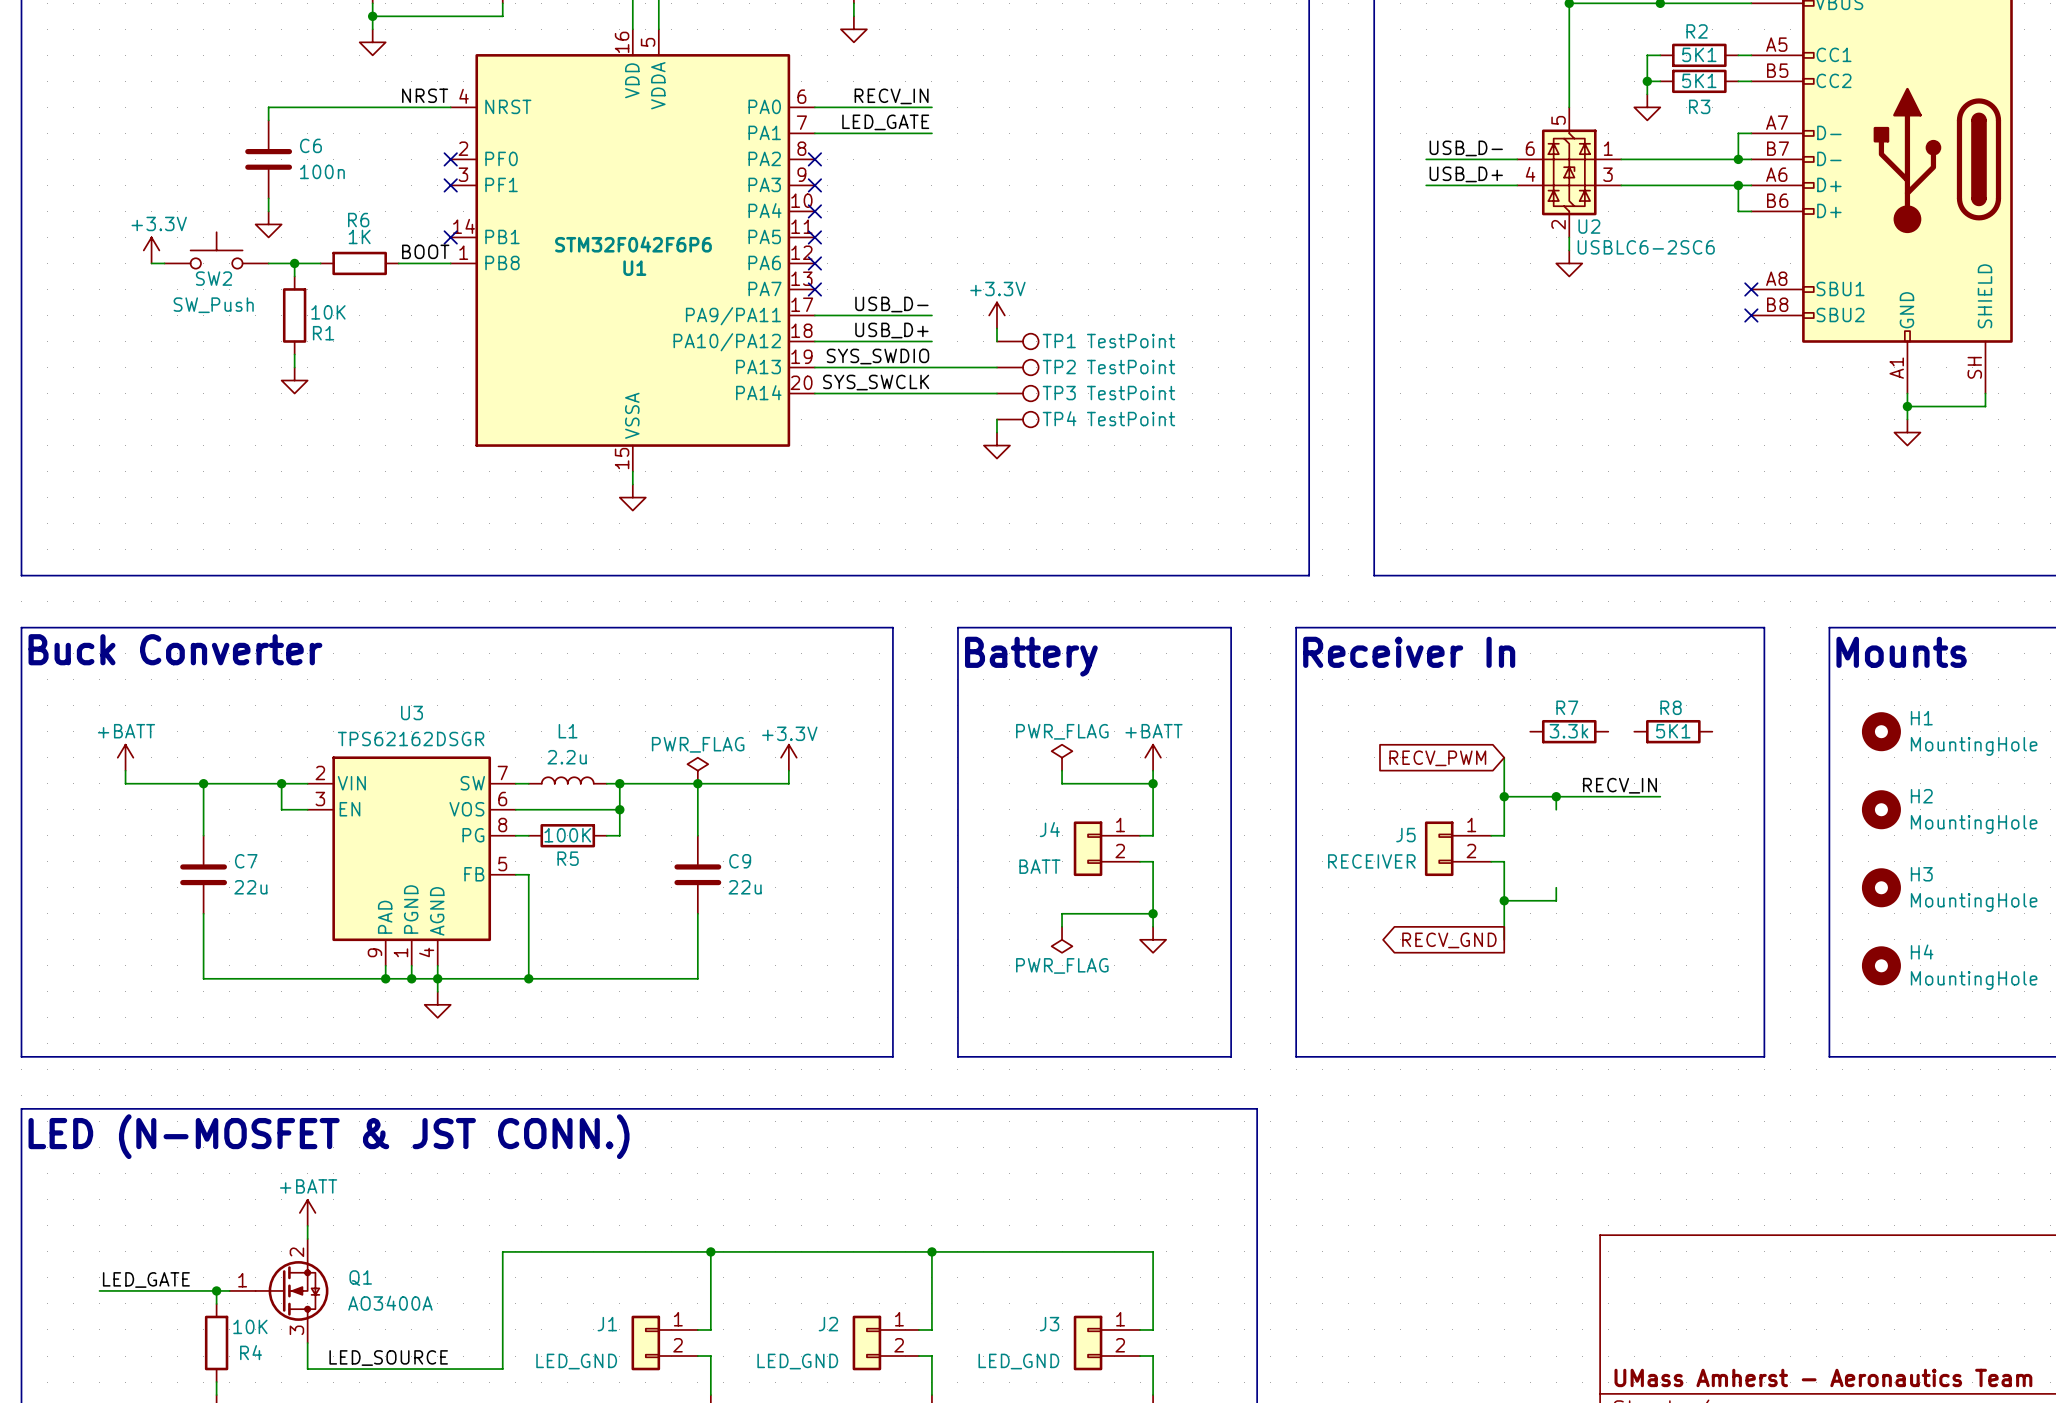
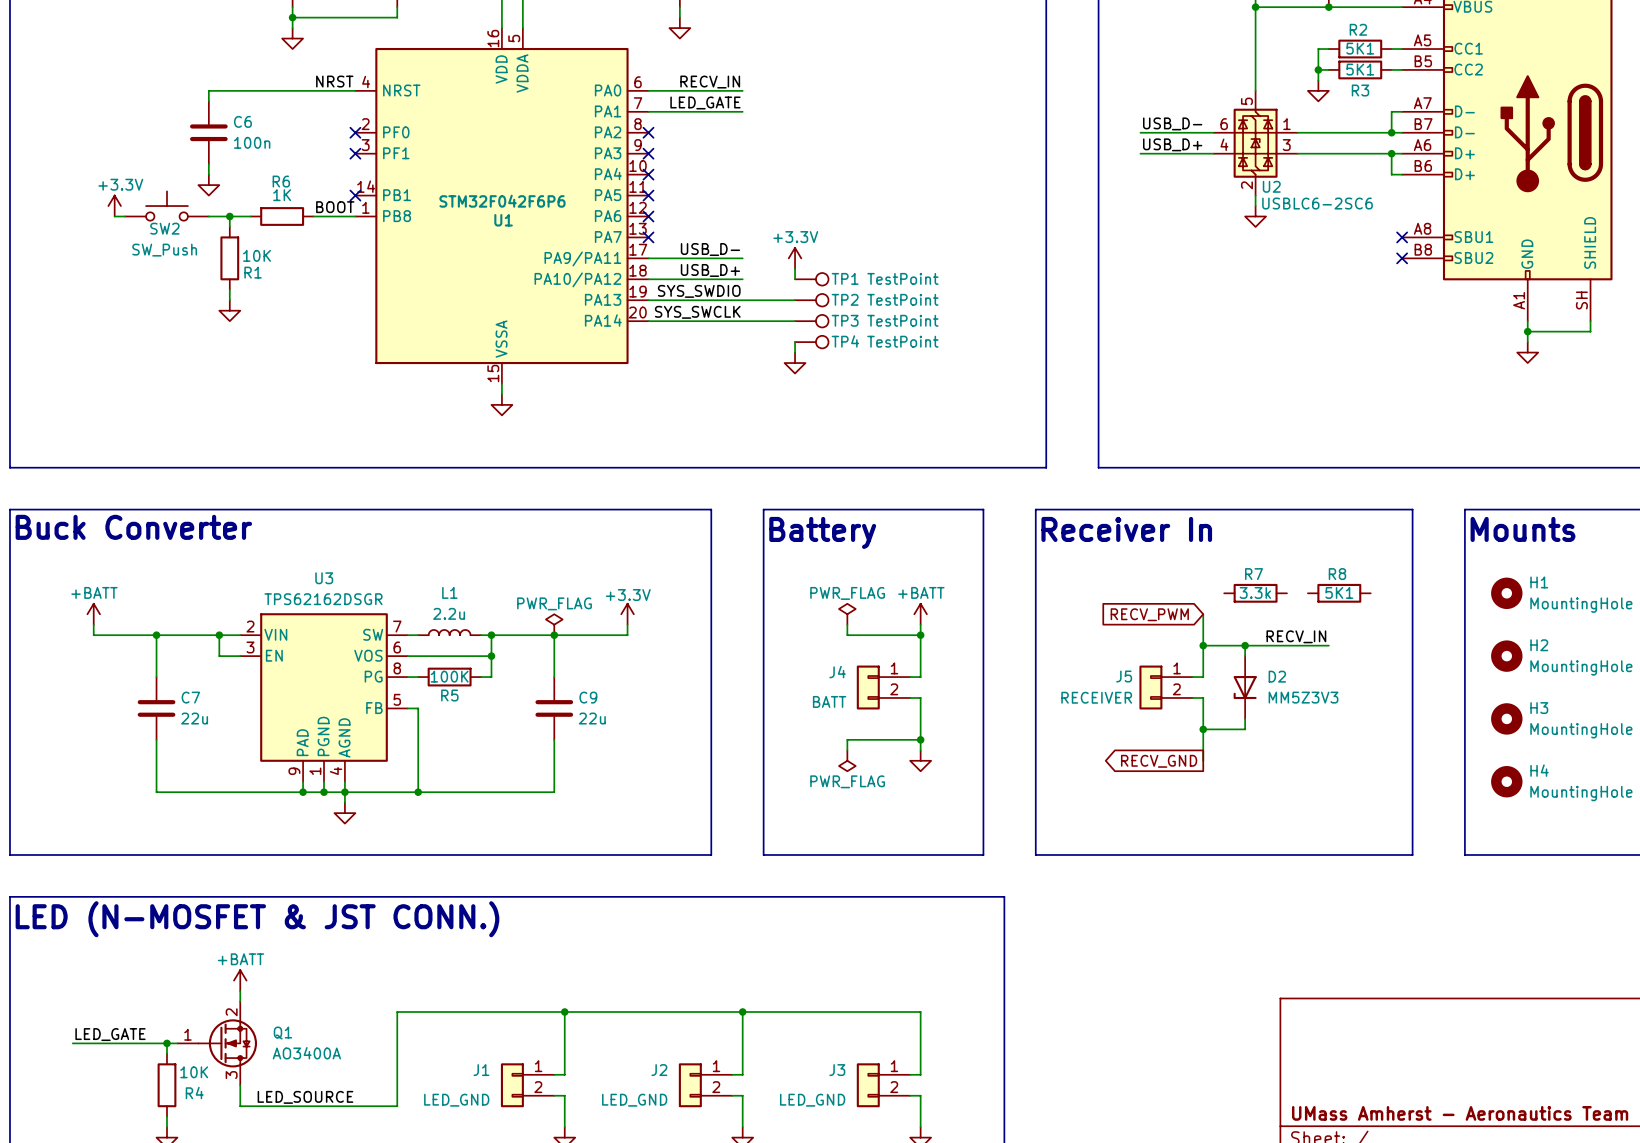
D2: none -> MM5Z3V3 (1245, 687)

